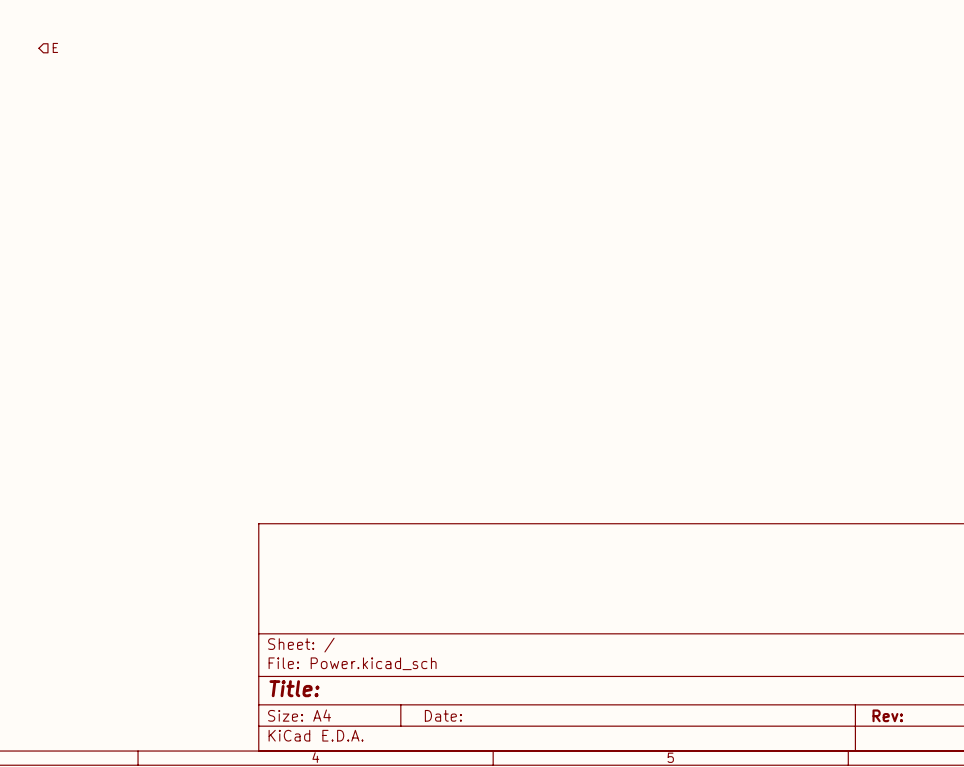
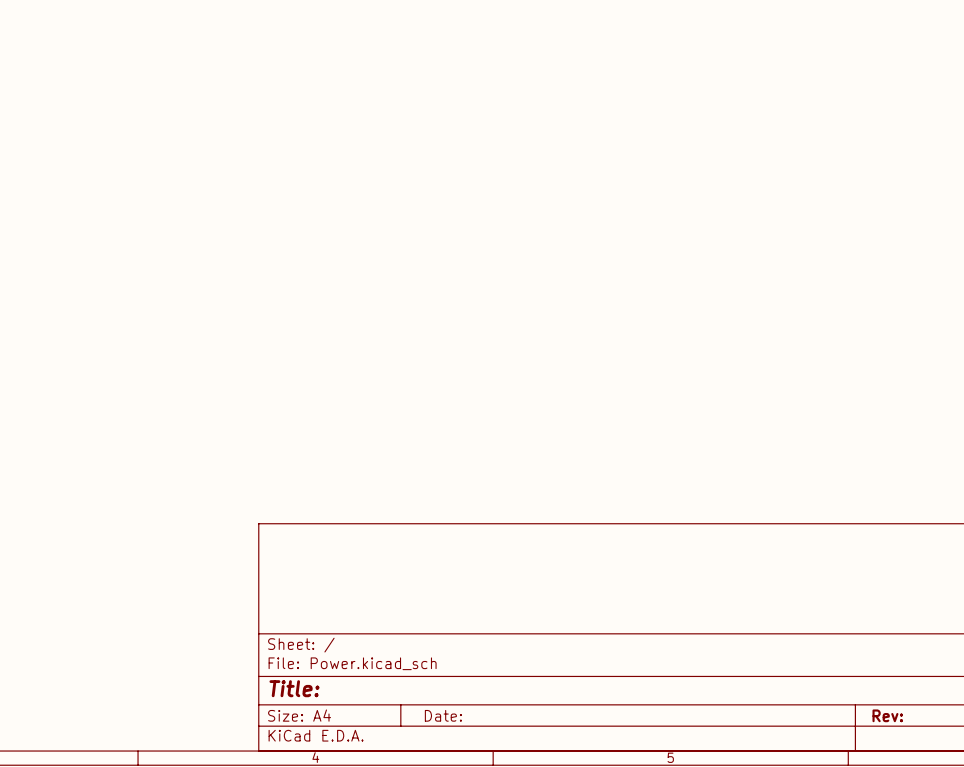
hierarchical label: E (55, 47) -> none

